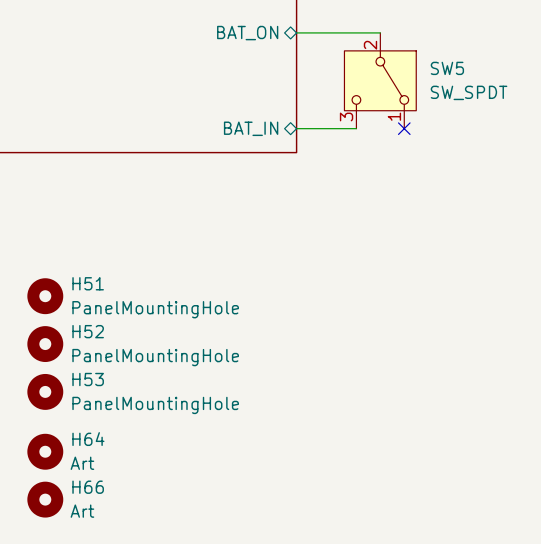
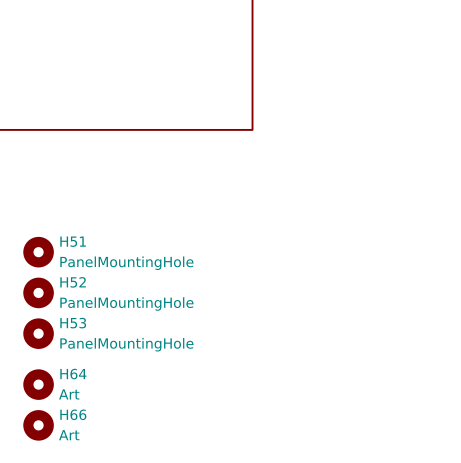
wire: (296, 32) (380, 32) -> none
sheet pin: BAT_ON (247, 33) -> none
SW5: SW_SPDT (380, 80) -> none
sheet pin: BAT_IN (251, 128) -> none
wire: (296, 128) (356, 128) -> none
no-connect mark: (404, 128) -> none

